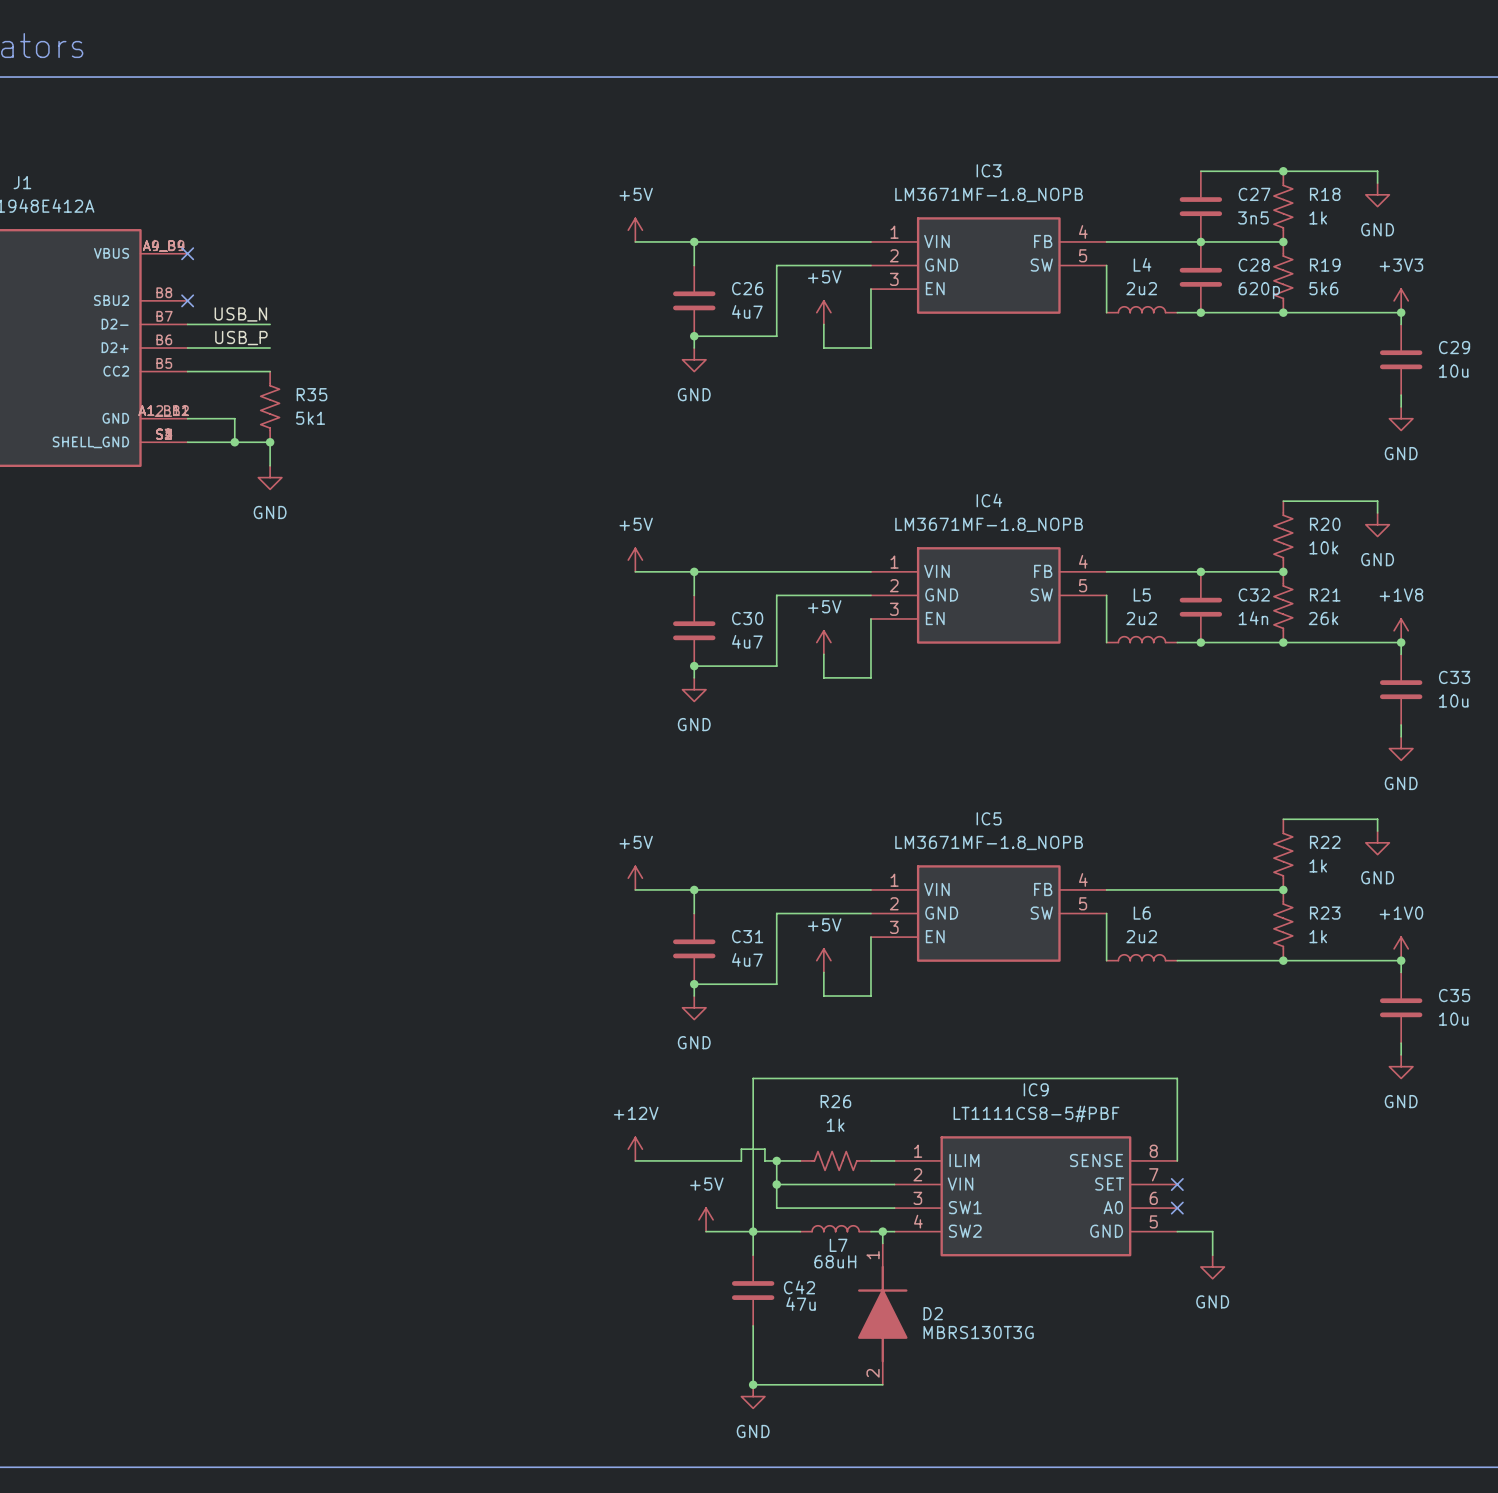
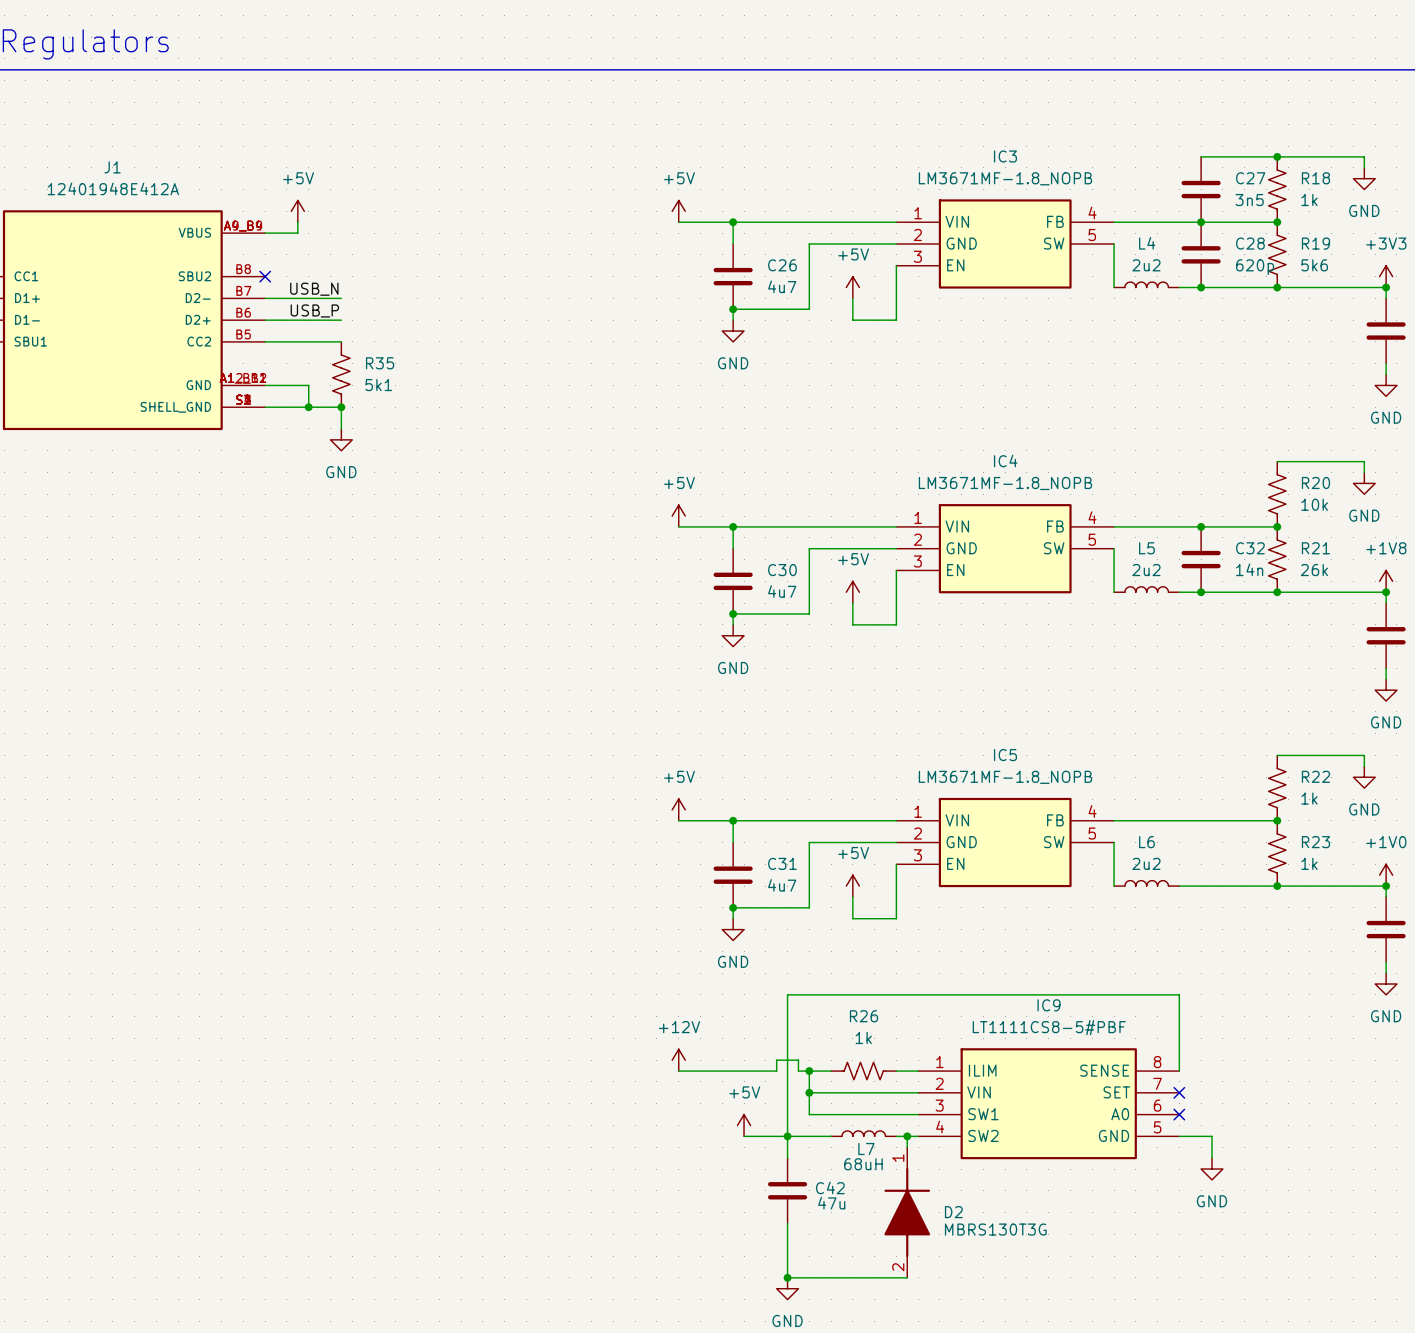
power symbol: none -> +5V (297, 211)
wire: none -> (297, 222) (297, 233) (265, 233)
no-connect mark: (187, 253) -> none

